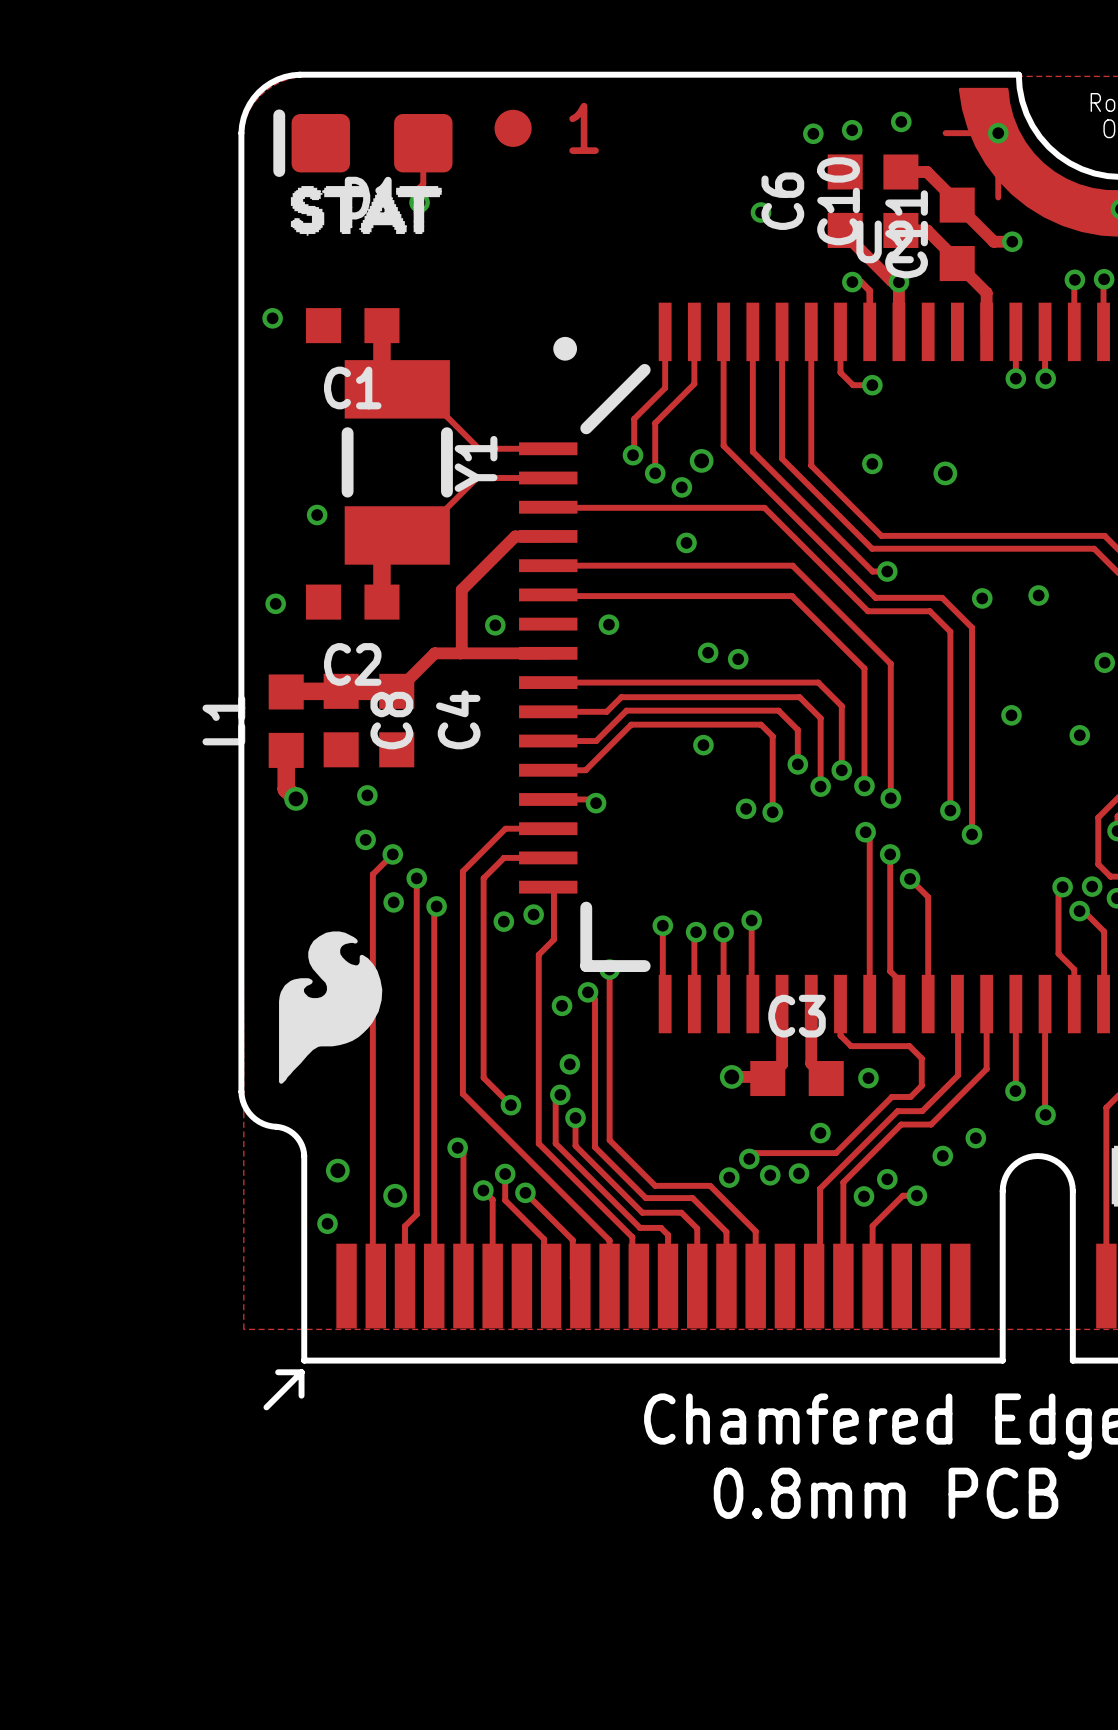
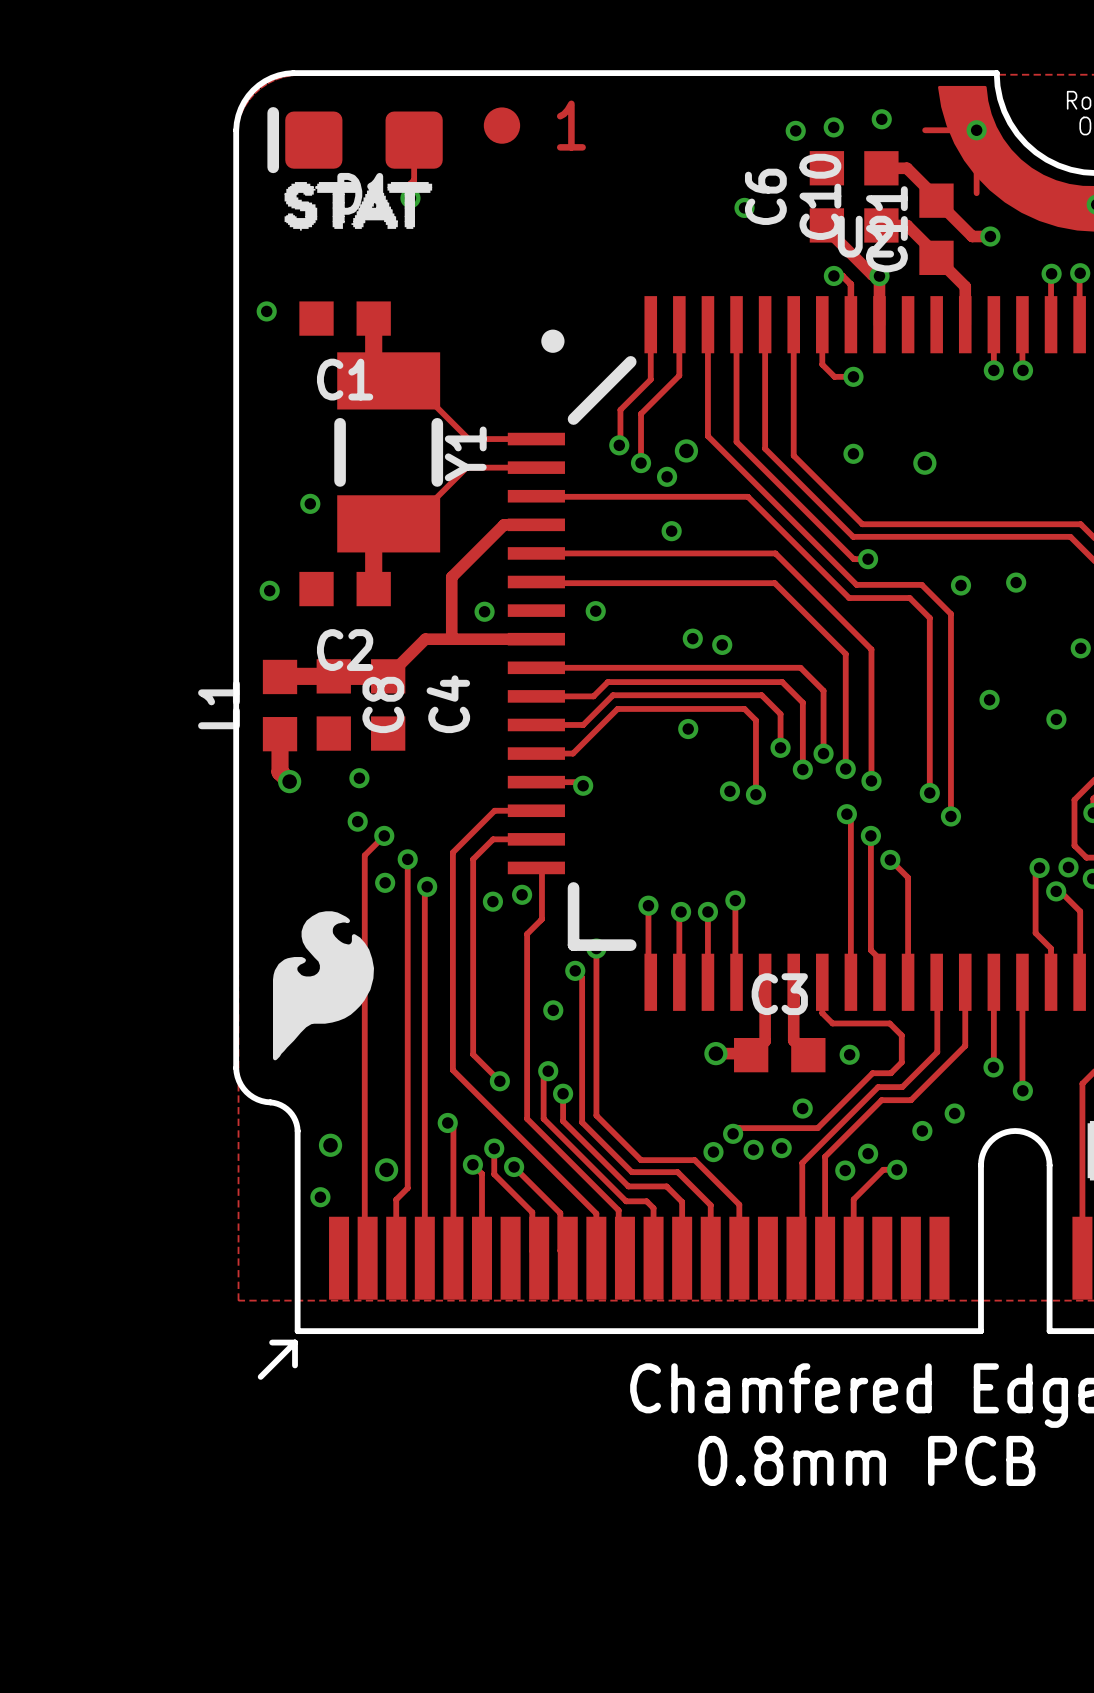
via: (562, 1005) -> none
via: none -> (553, 1010)
via: (569, 1064) -> none

